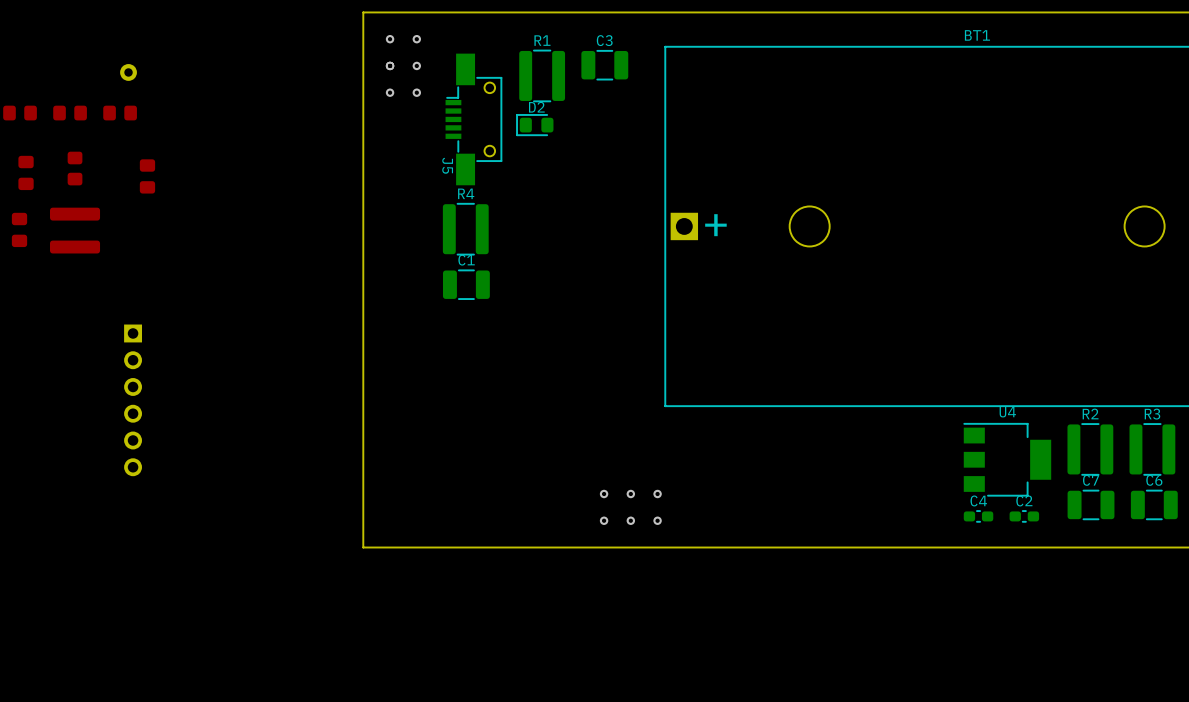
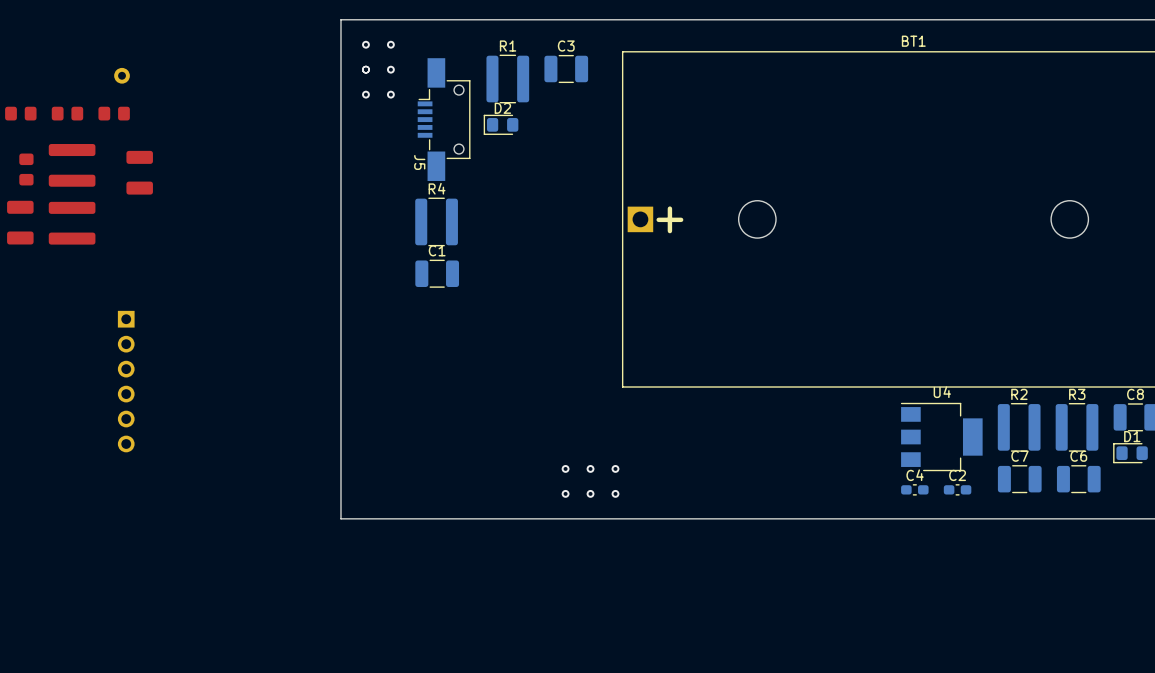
part footprint: [67, 151, 83, 186] -> [48, 144, 96, 187]
part footprint: [139, 159, 156, 194] -> [126, 150, 153, 195]
part footprint: [11, 212, 28, 248] -> [7, 200, 34, 245]

